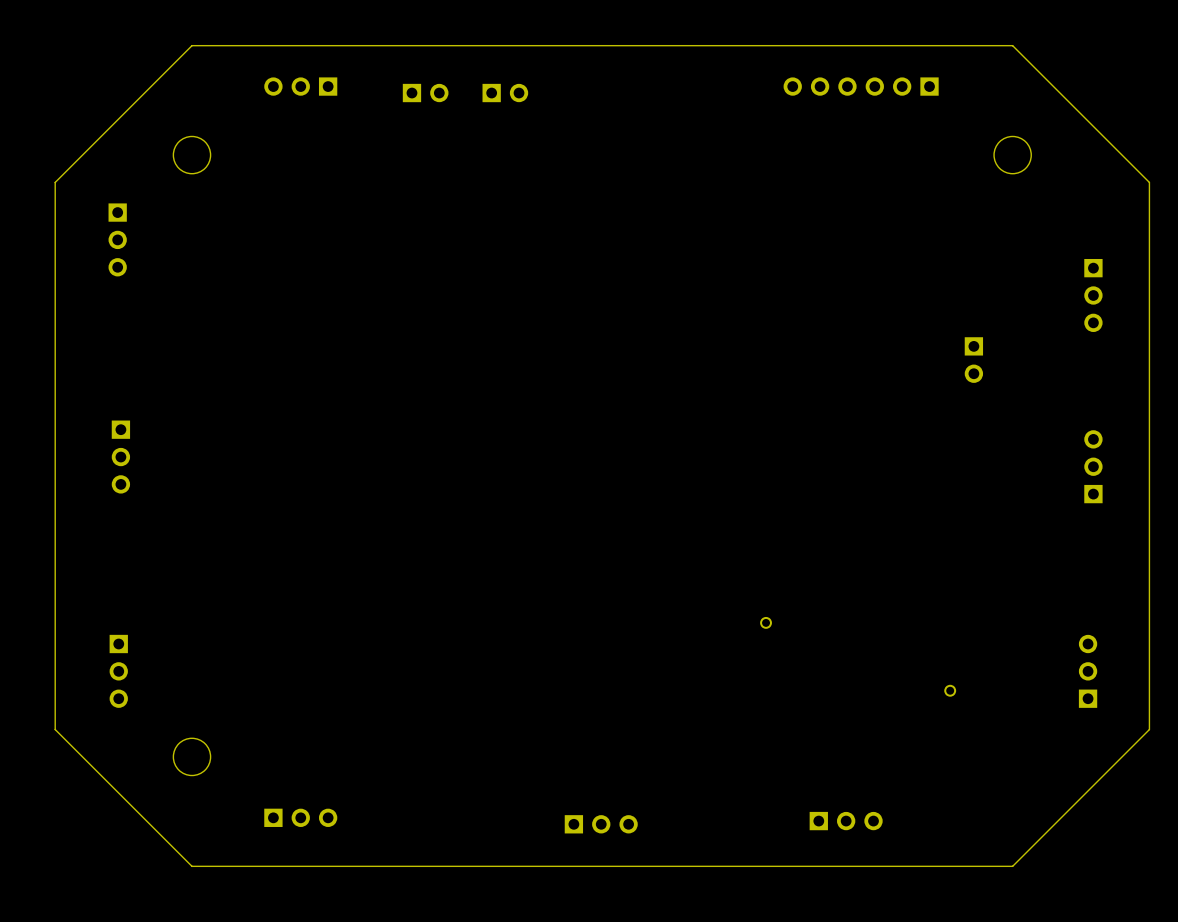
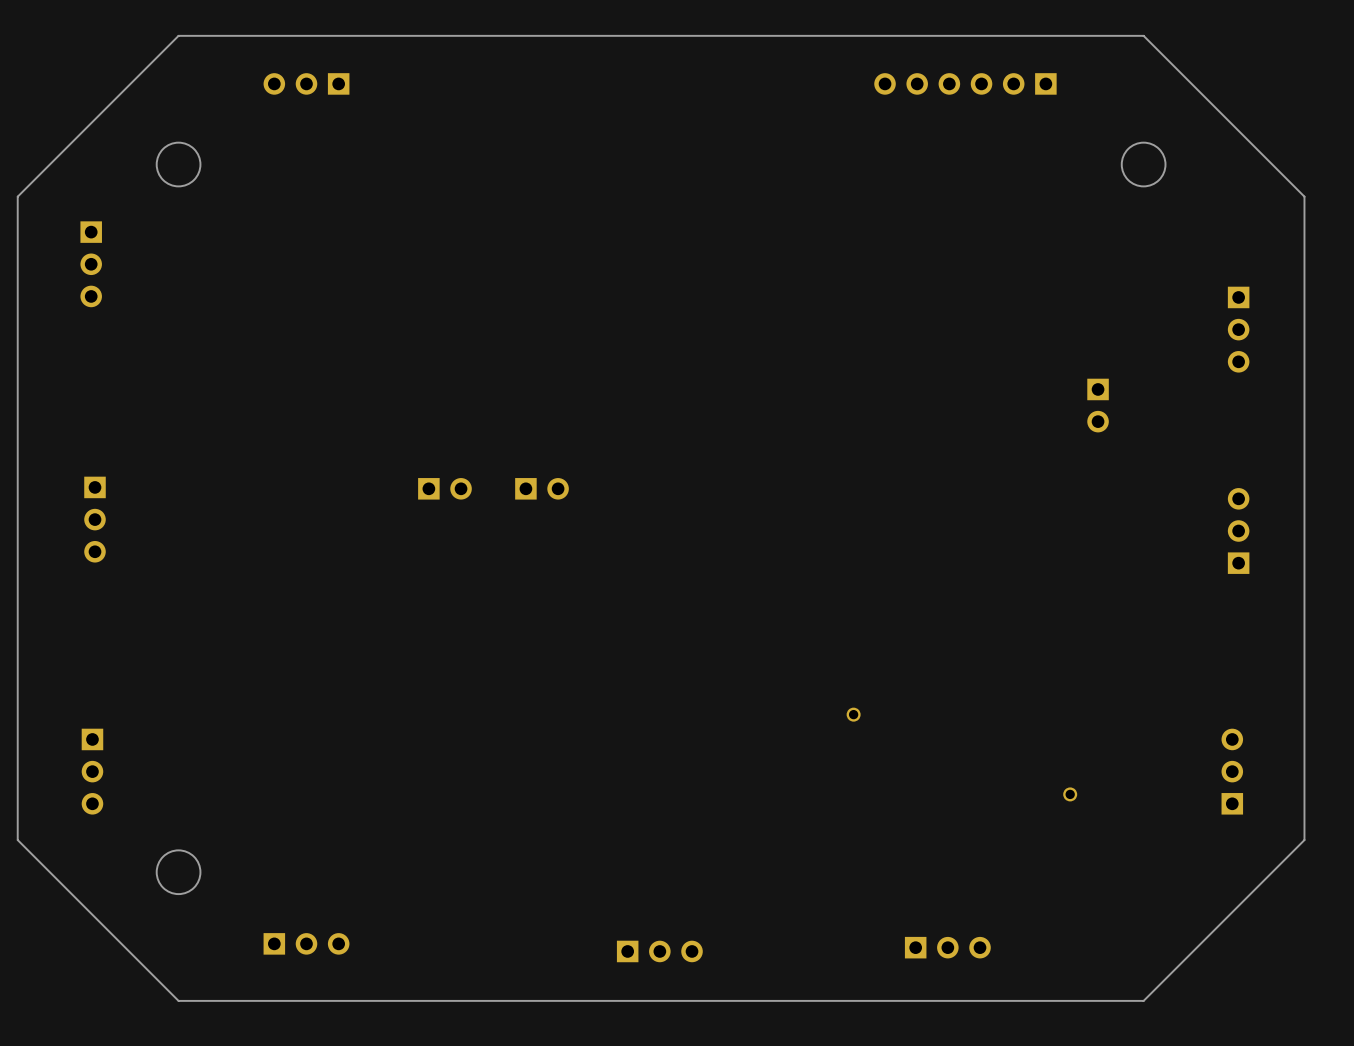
part: (425, 93) -> none
part: (505, 93) -> none
part: none -> (444, 488)
part: none -> (542, 488)

